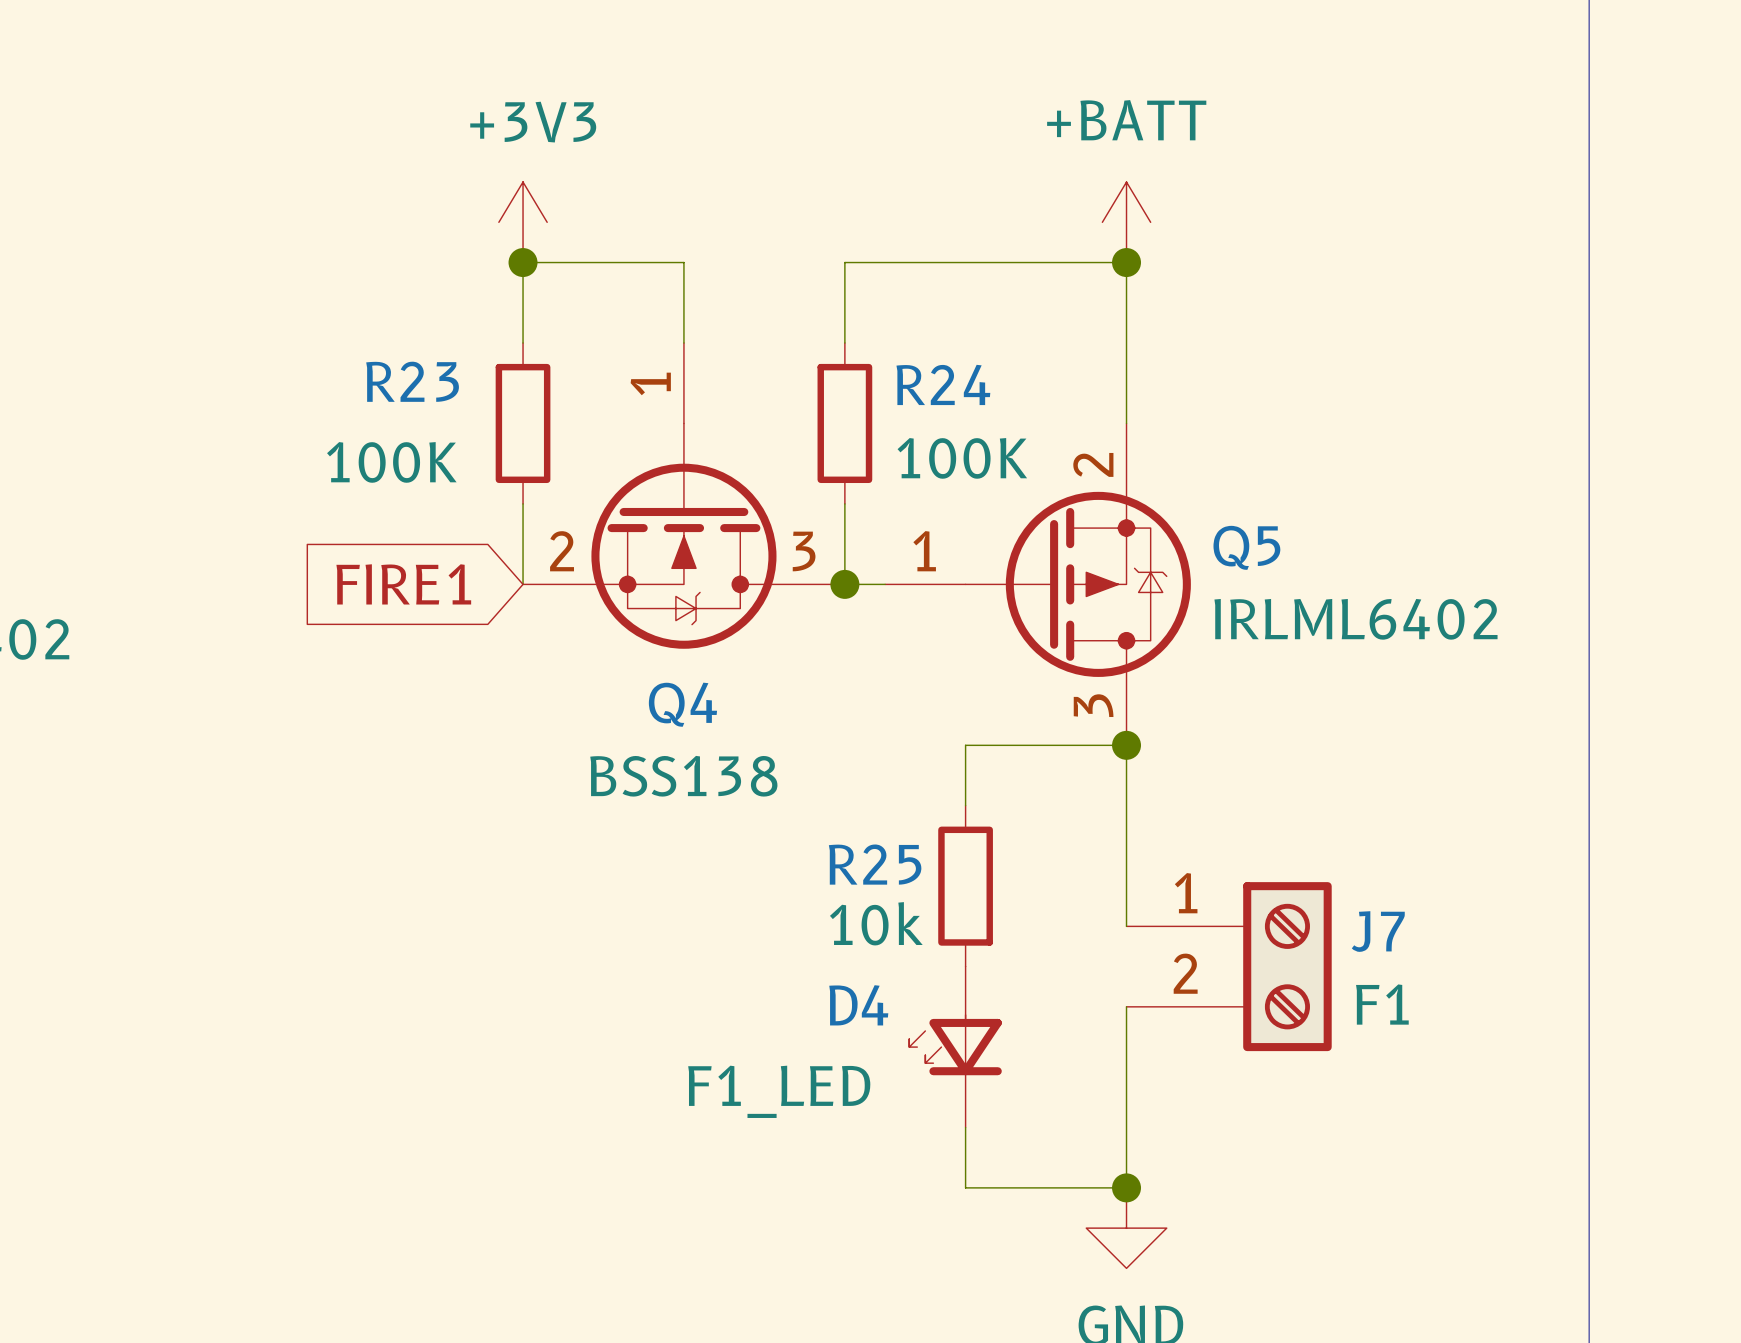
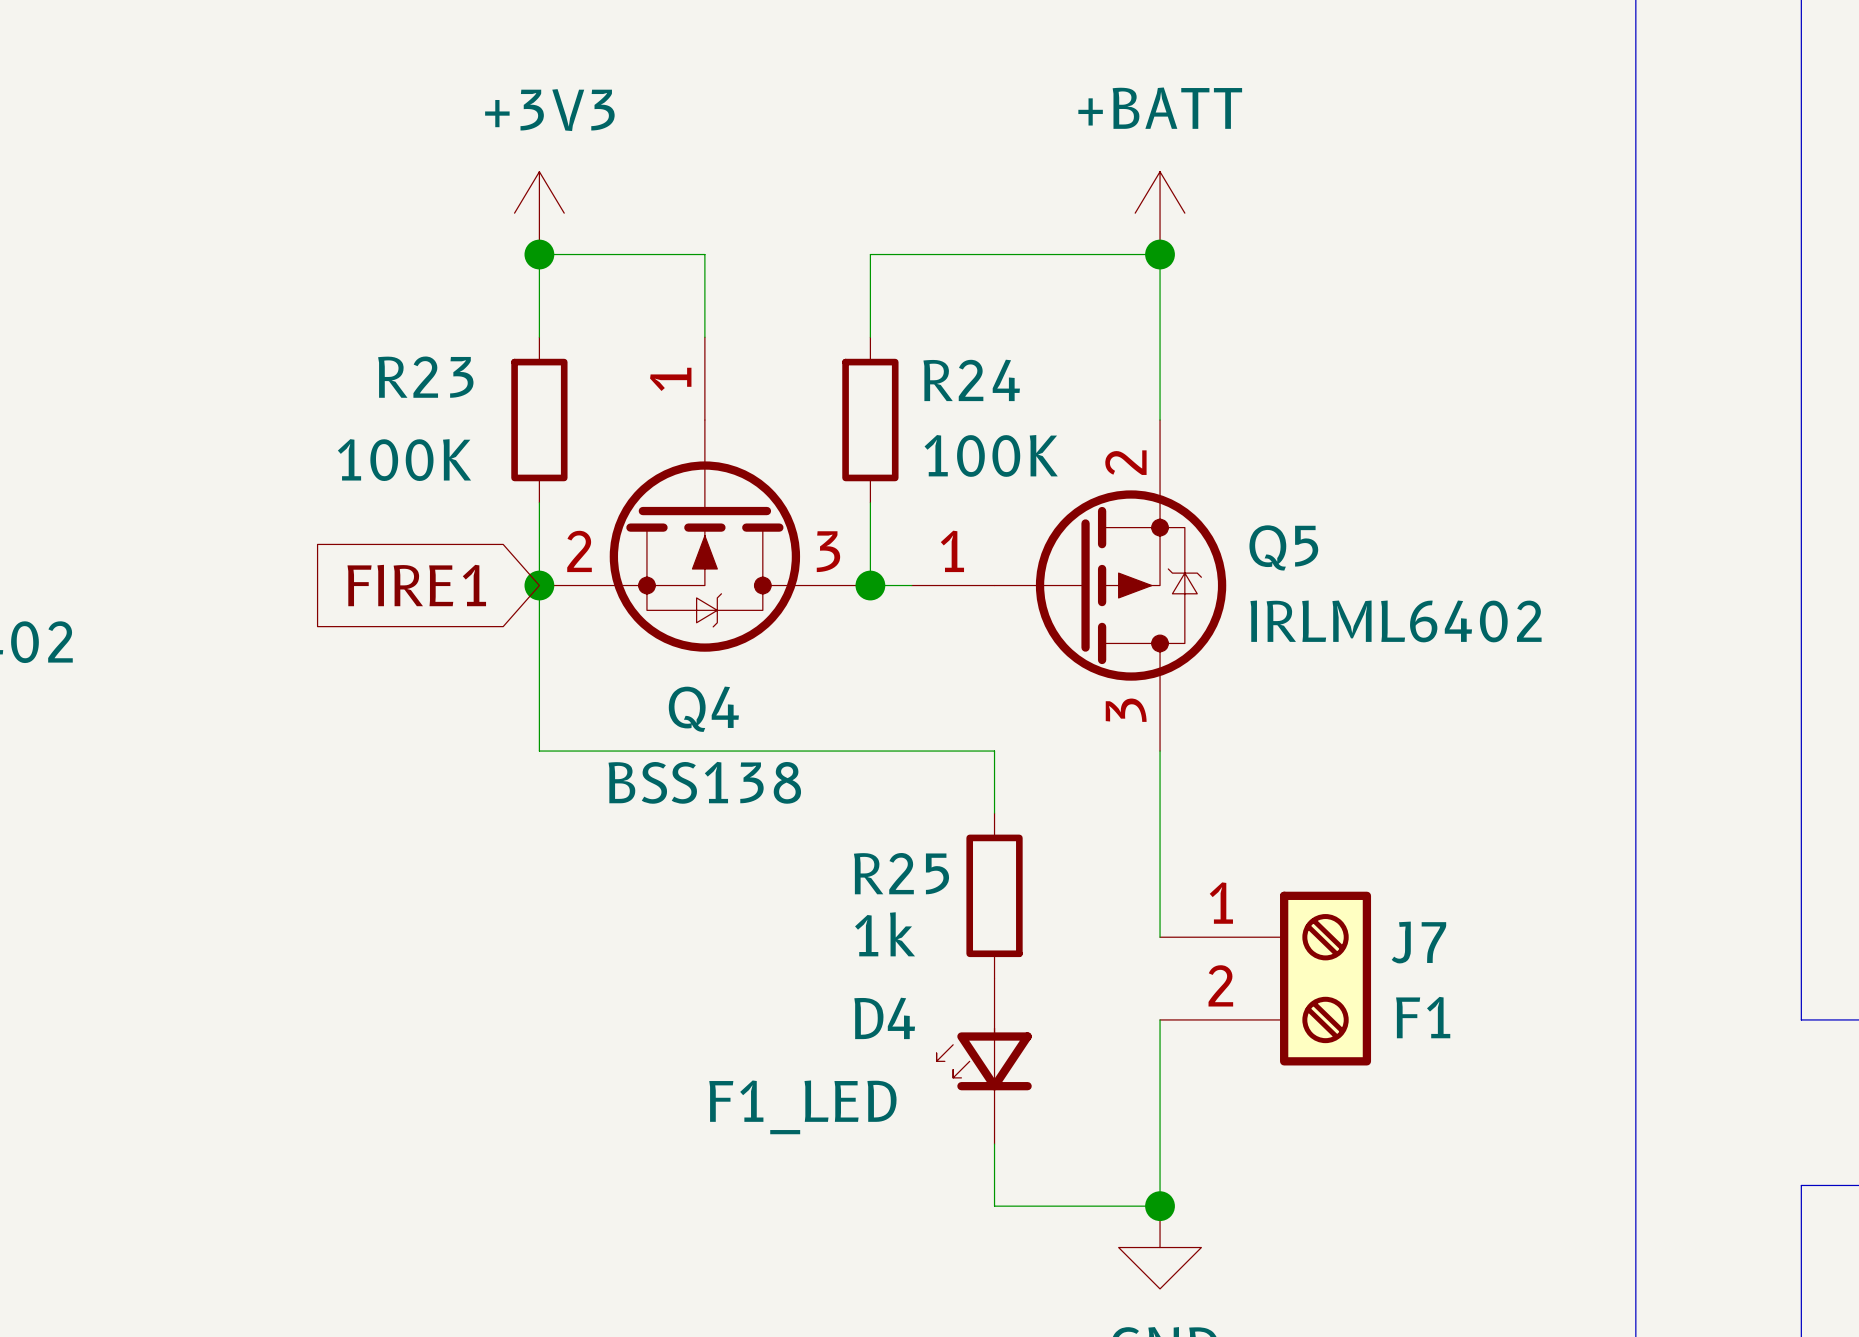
junction: none -> (539, 585)
wire: (965, 745) (1126, 745) -> (994, 751) (539, 751) (539, 585)
junction: (1126, 745) -> none
R25 value: 10k (876, 923) -> 1k (885, 934)

